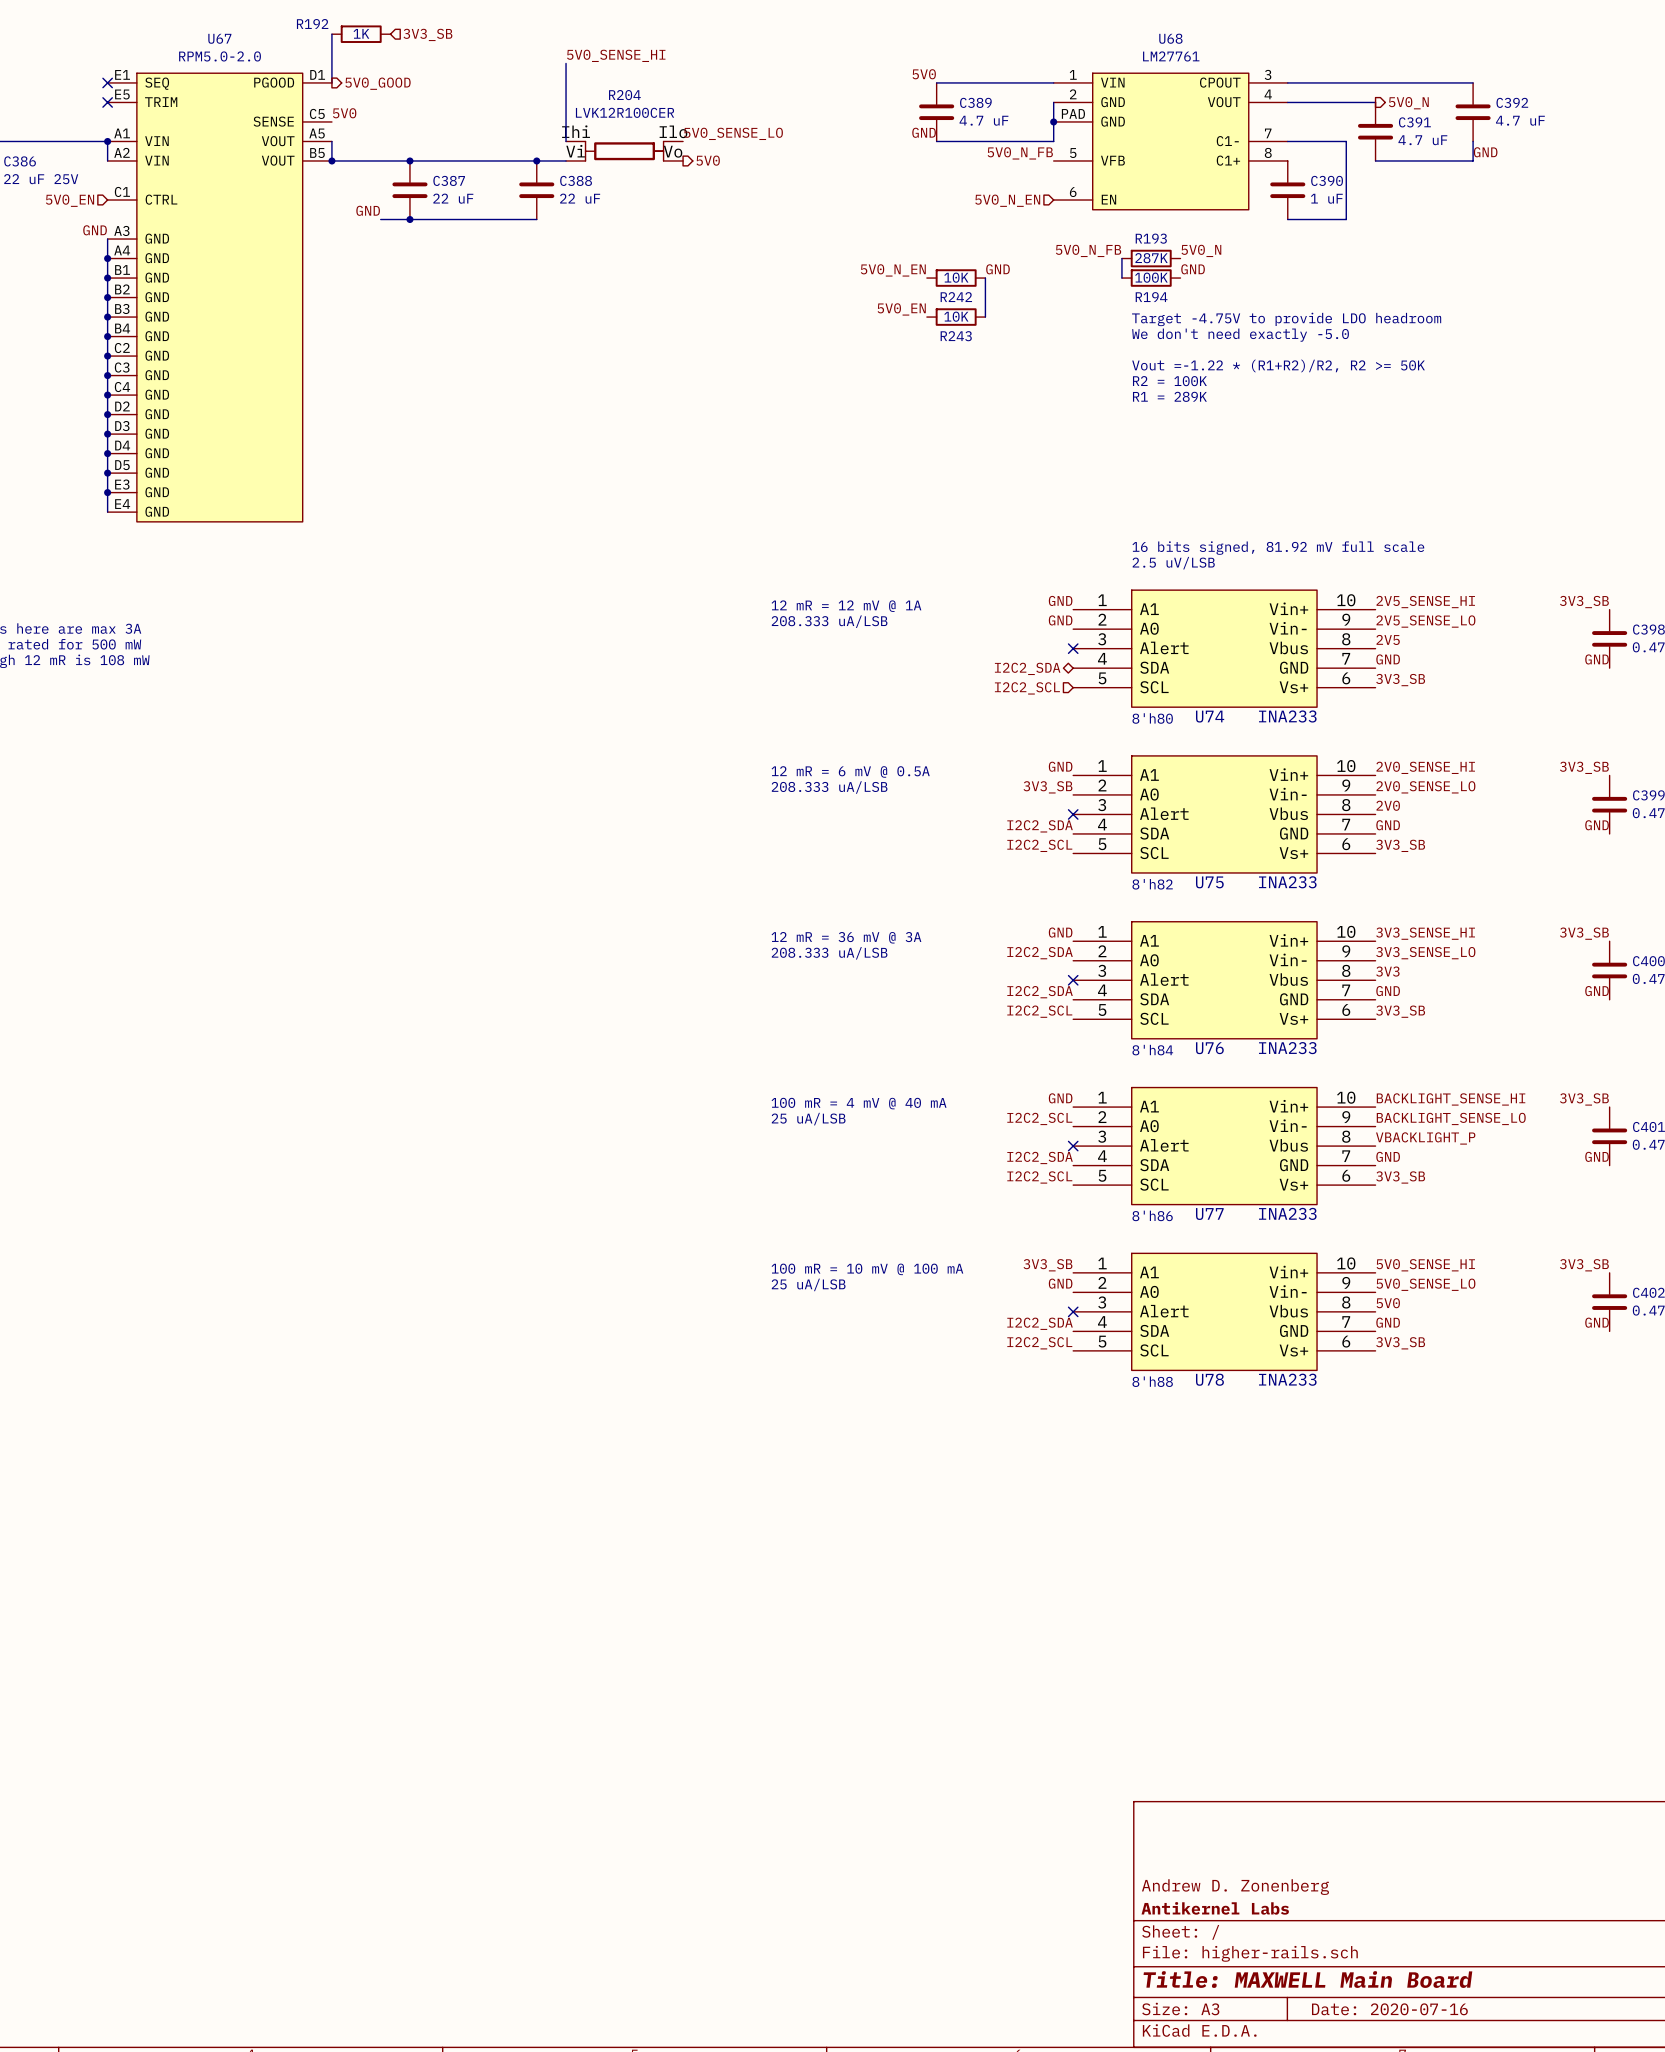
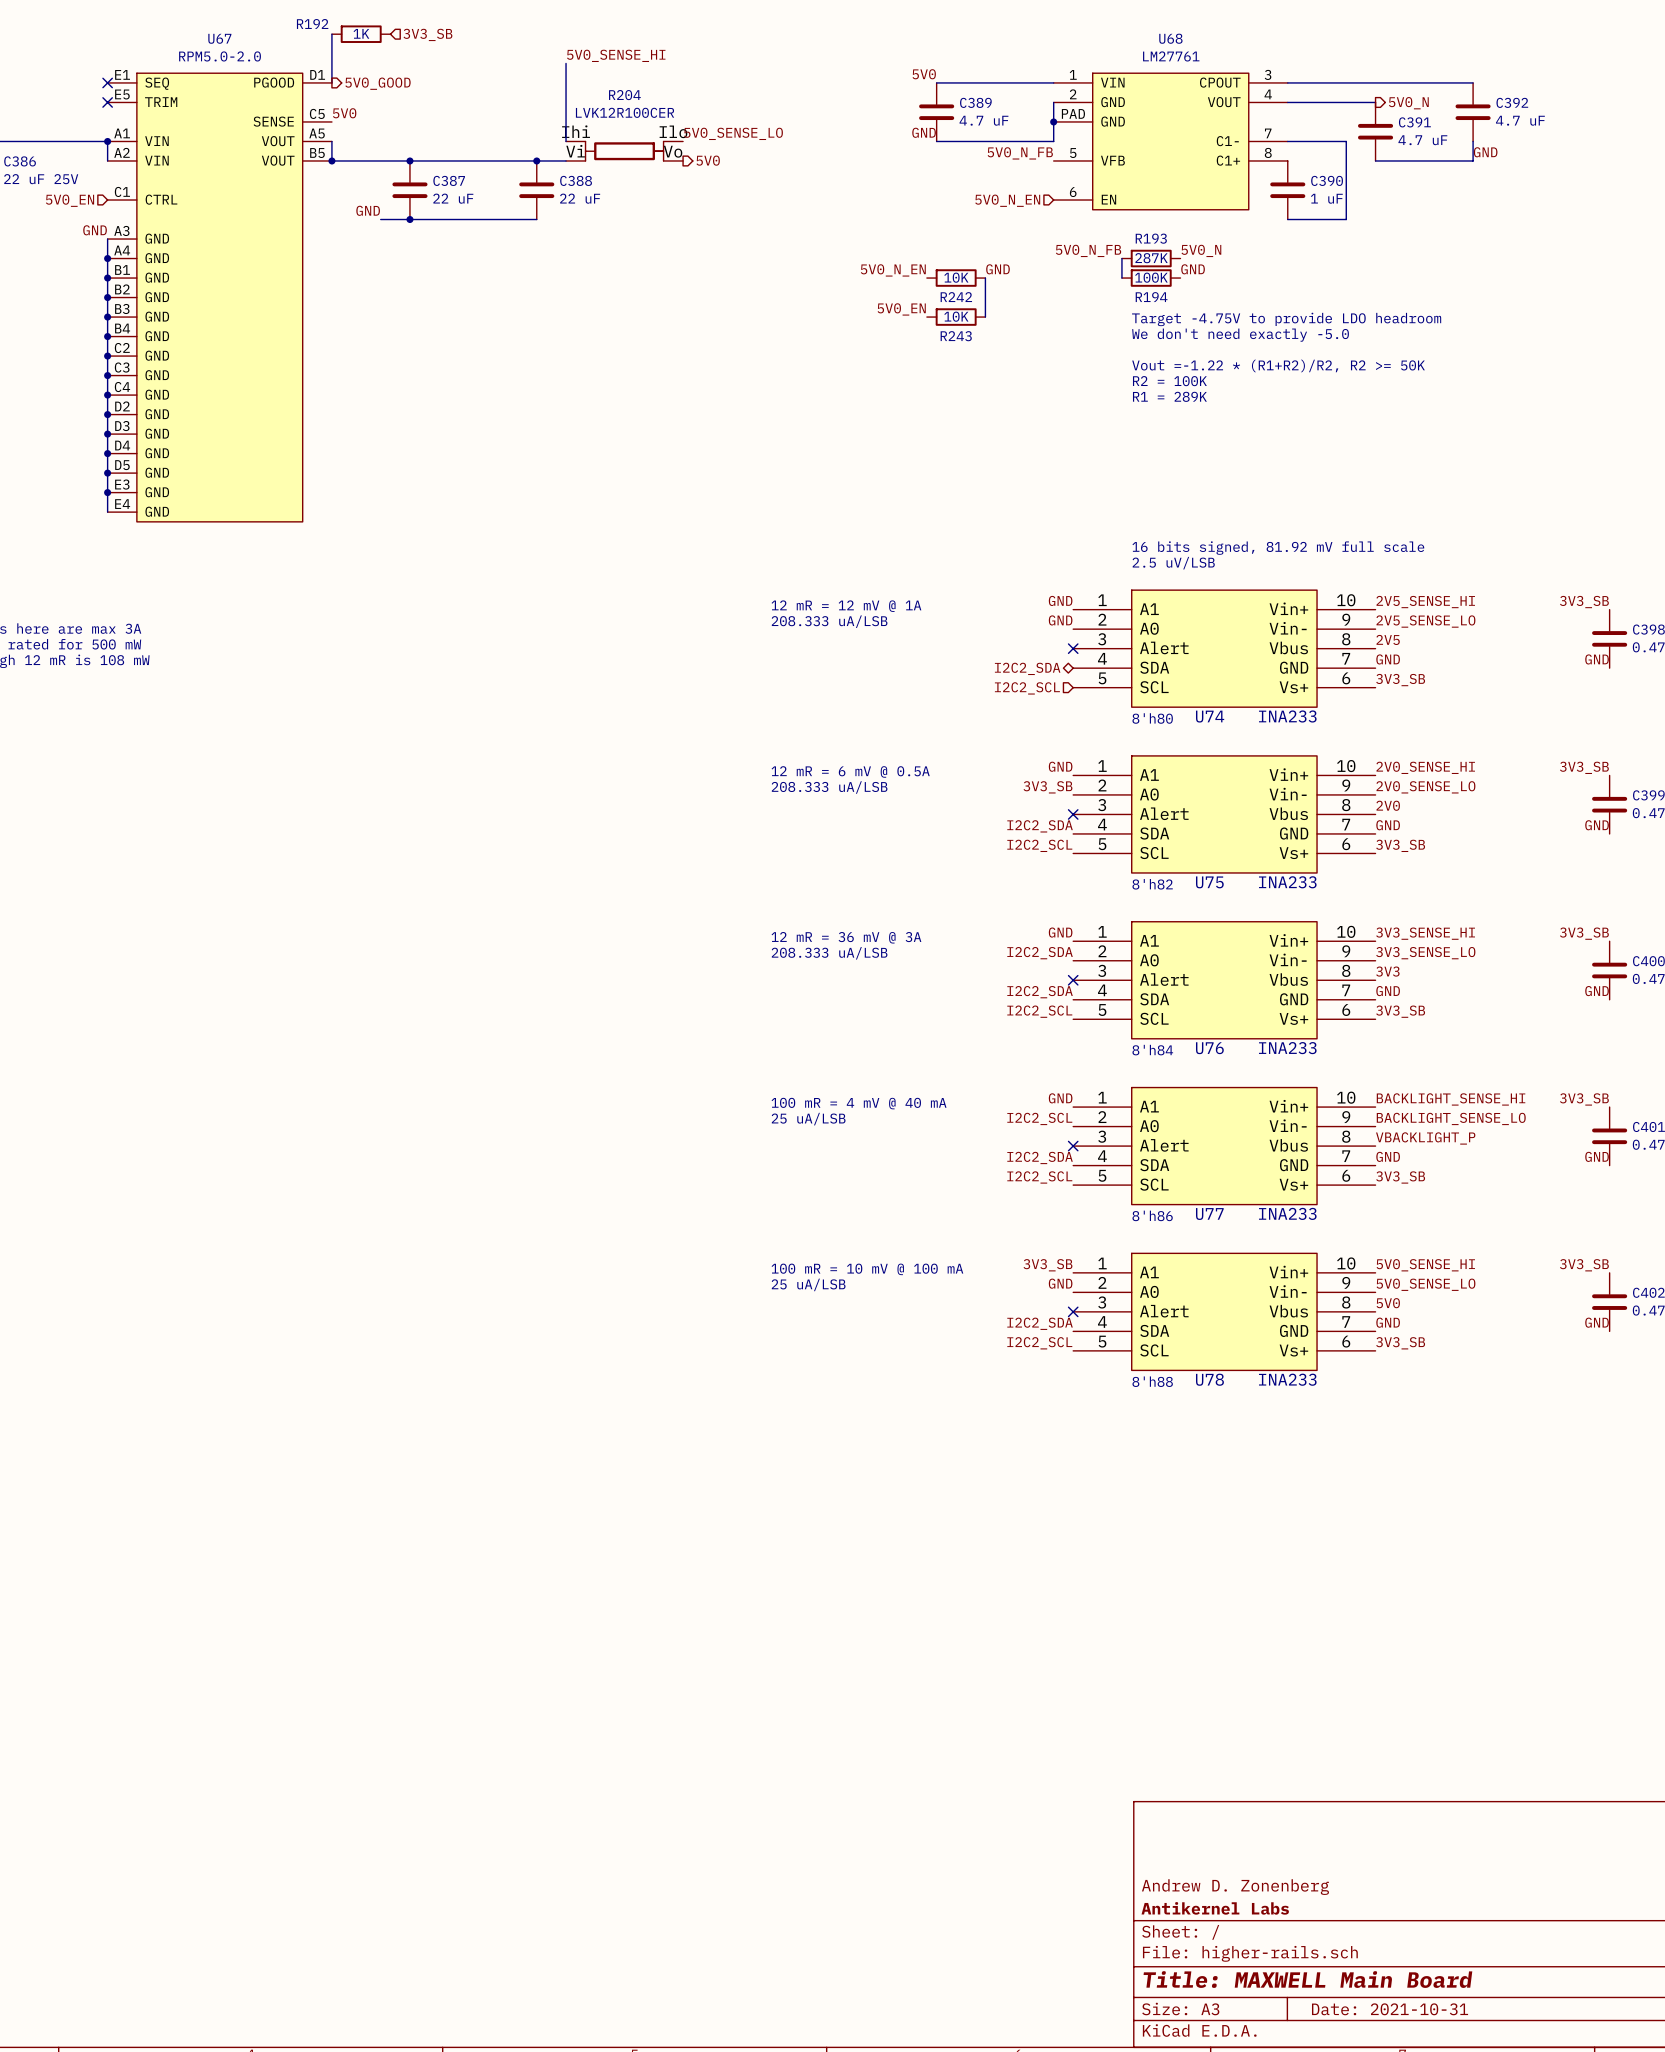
title block: Date: 2020-07-16 (1389, 2009) -> Date: 2021-10-31 (1390, 2009)

